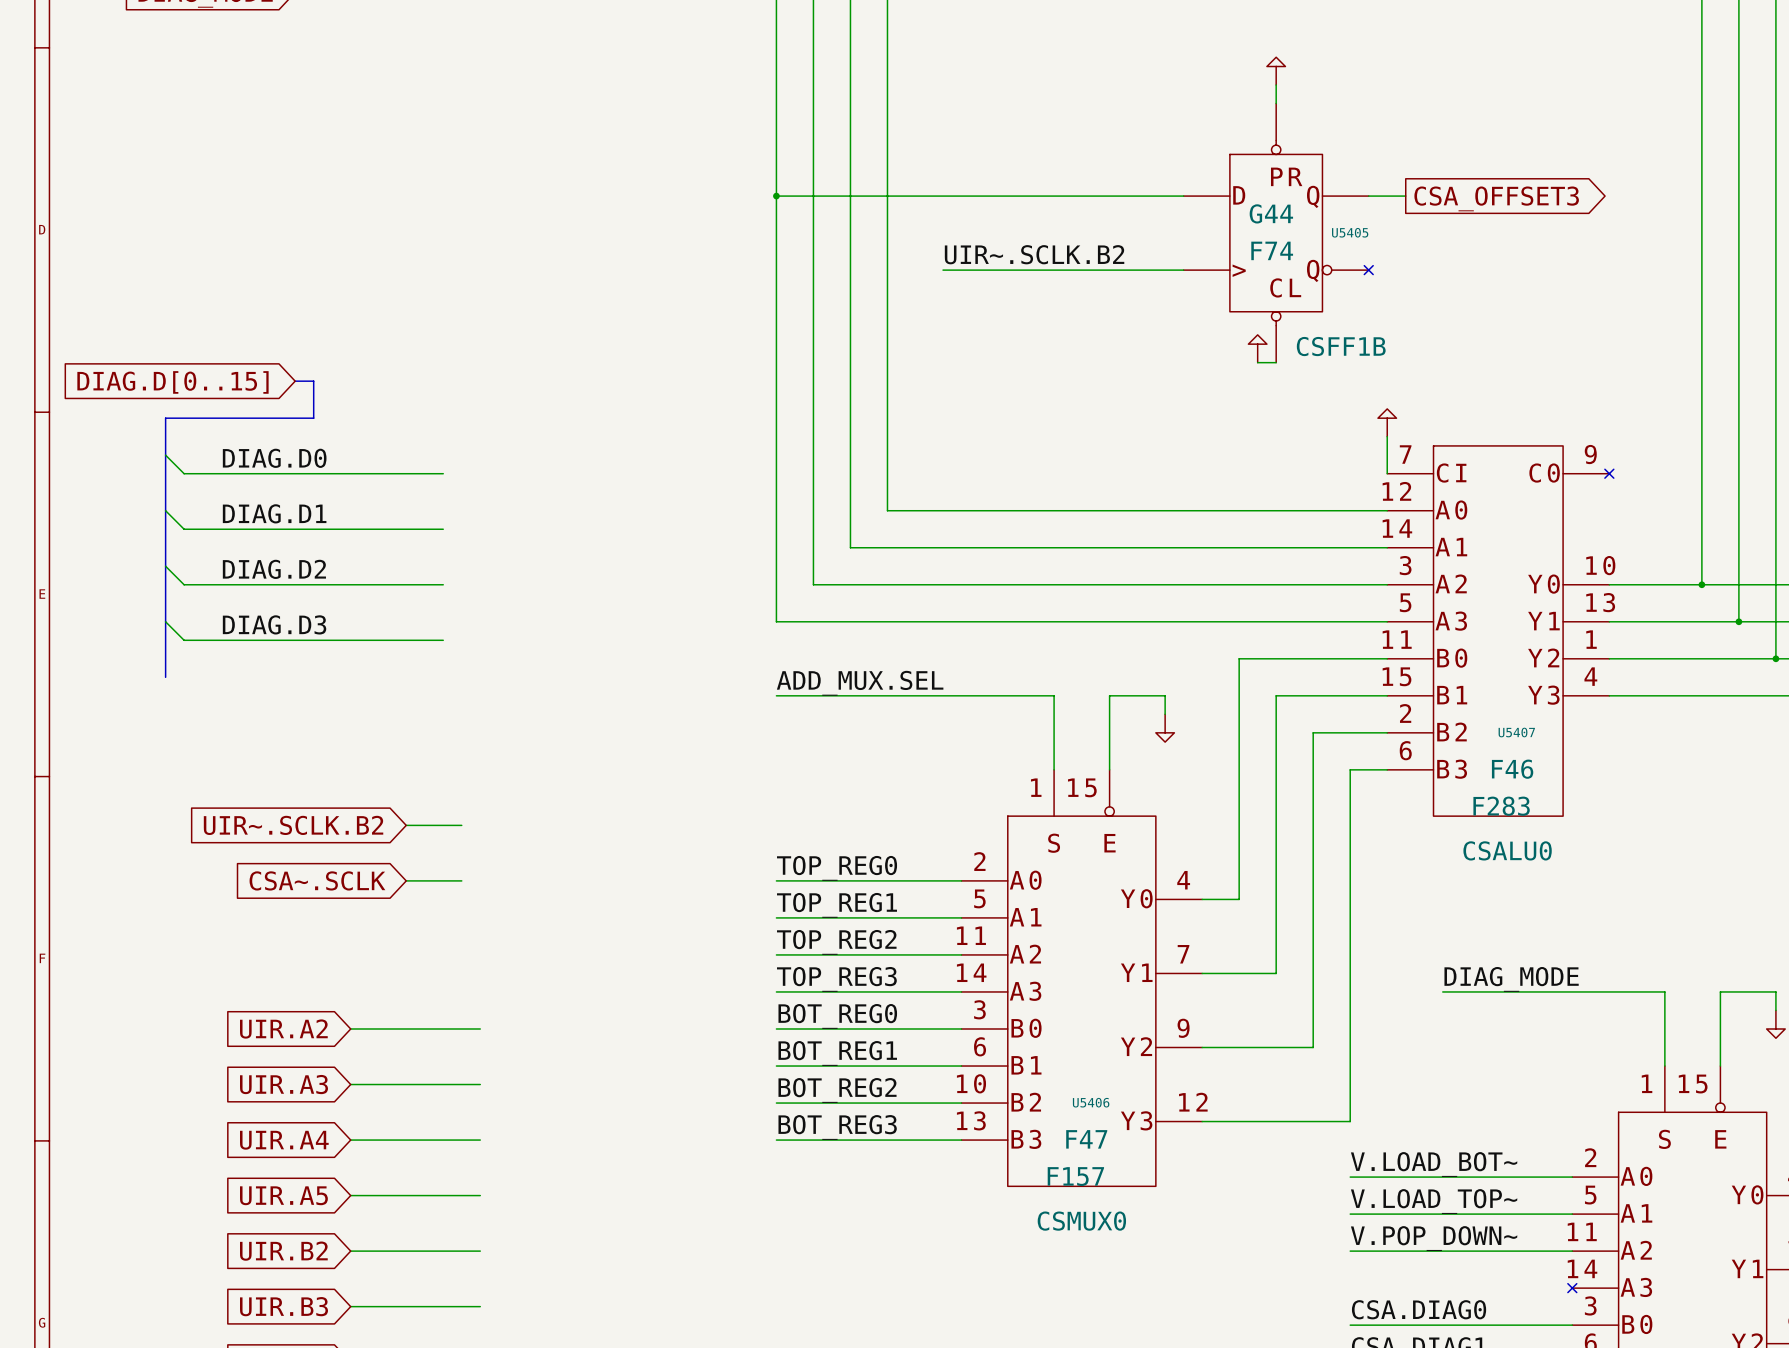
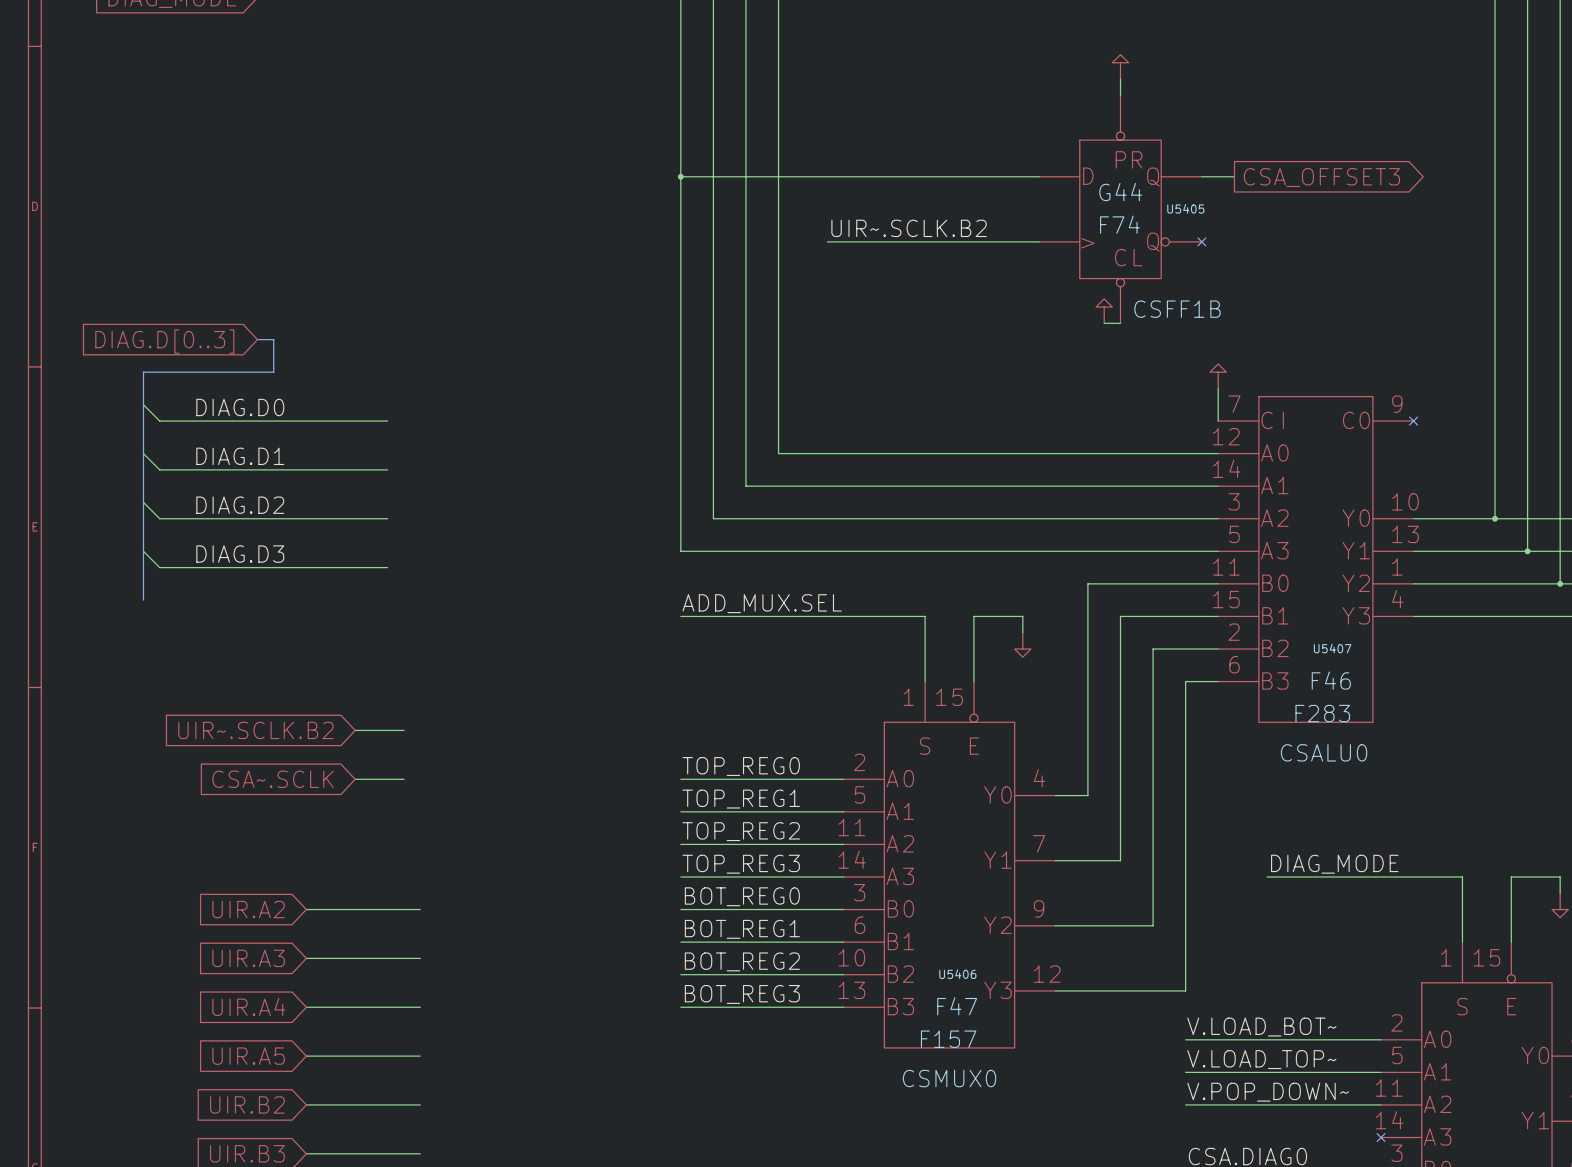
global label: DIAG.D[0..15] (172, 382) -> DIAG.D[0..3] (164, 341)

